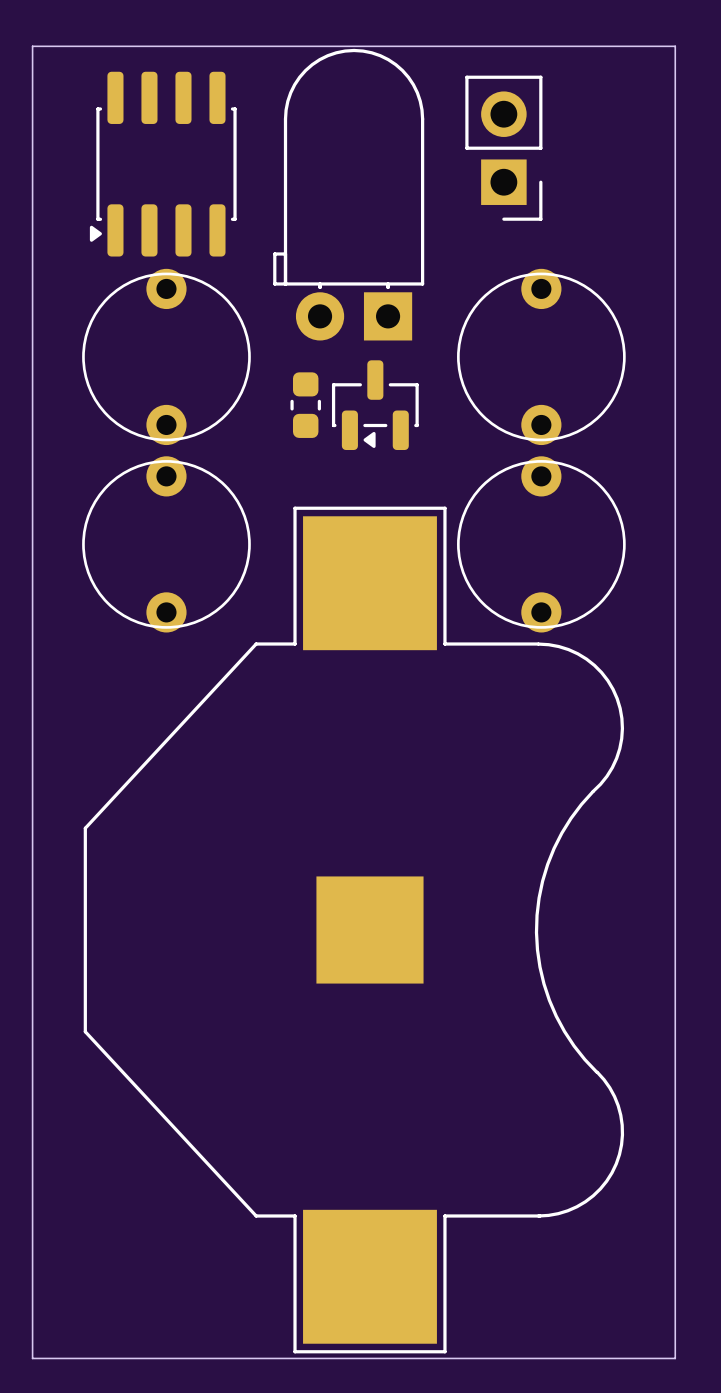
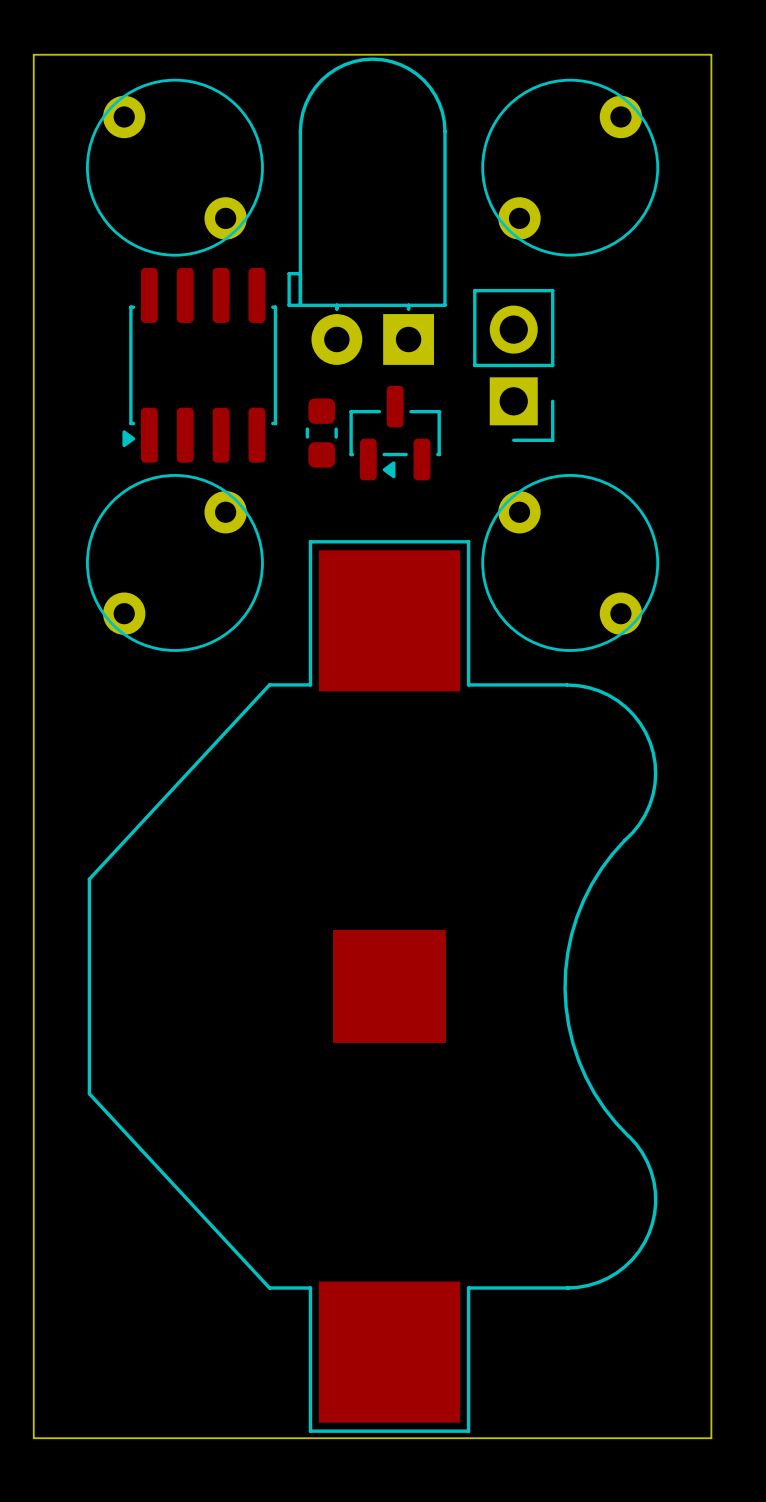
part footprint: [89, 71, 237, 257] -> [86, 78, 264, 257]
part position: (503, 148) -> (513, 365)
part: none -> (570, 167)
part: none -> (199, 365)
part: (166, 356) -> none
part: (541, 356) -> none
part rotation: 0° (166, 544) -> 45° clockwise (174, 562)
part rotation: 0° (541, 544) -> 45° counterclockwise (570, 562)

